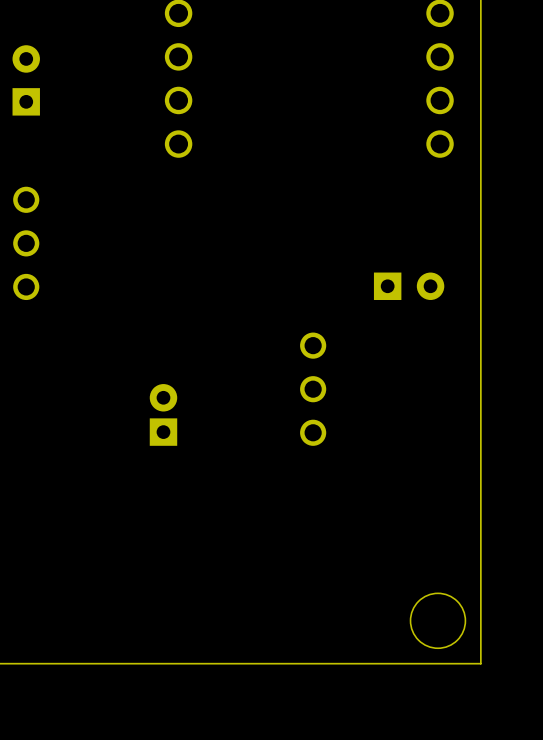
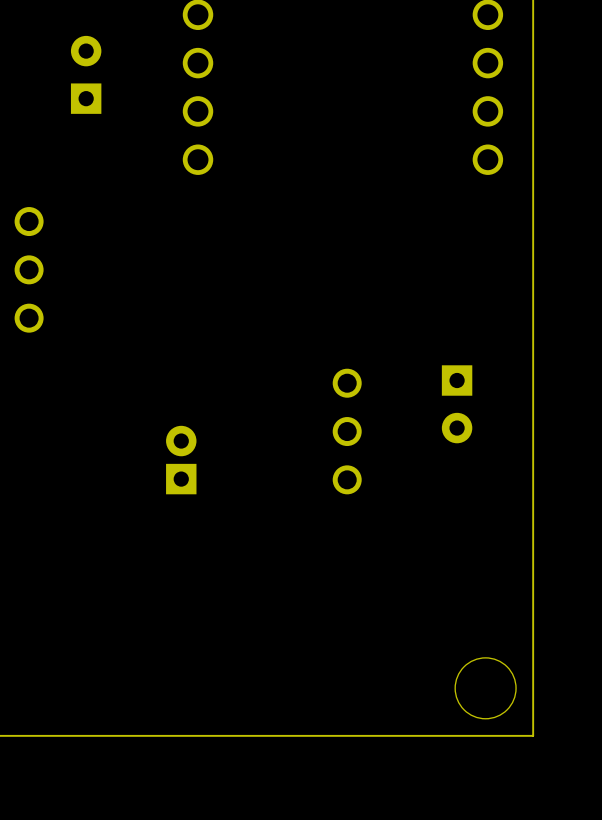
part position: (26, 80) -> (86, 74)
part rotation: 0° (409, 286) -> 90° clockwise (457, 404)
part position: (409, 286) -> (457, 404)

